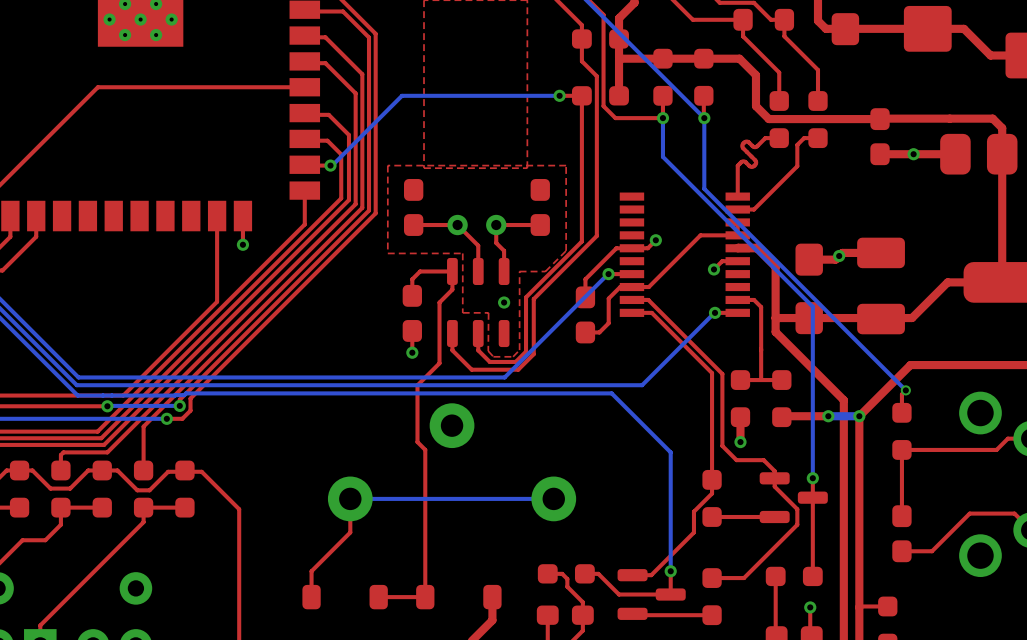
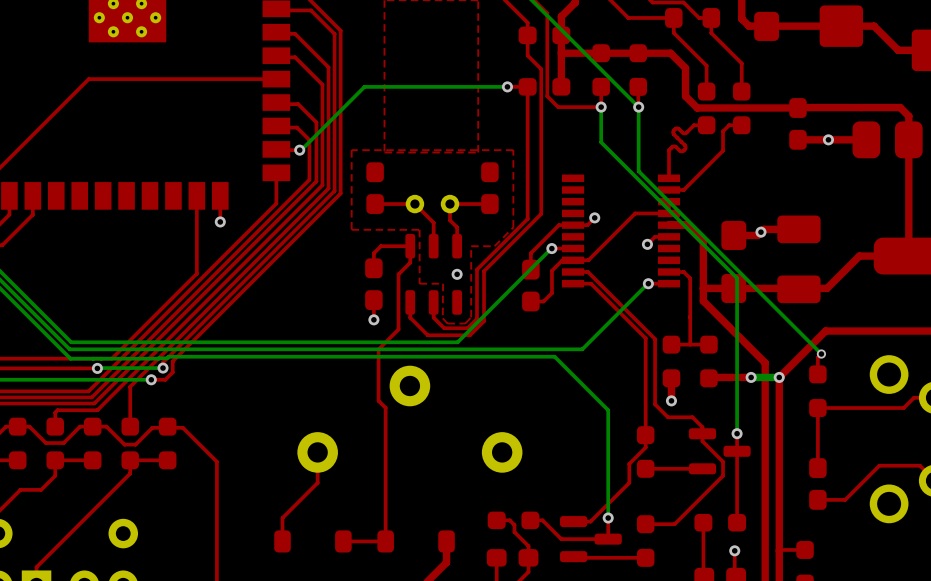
bottom track: (553, 498) (350, 498) -> none

